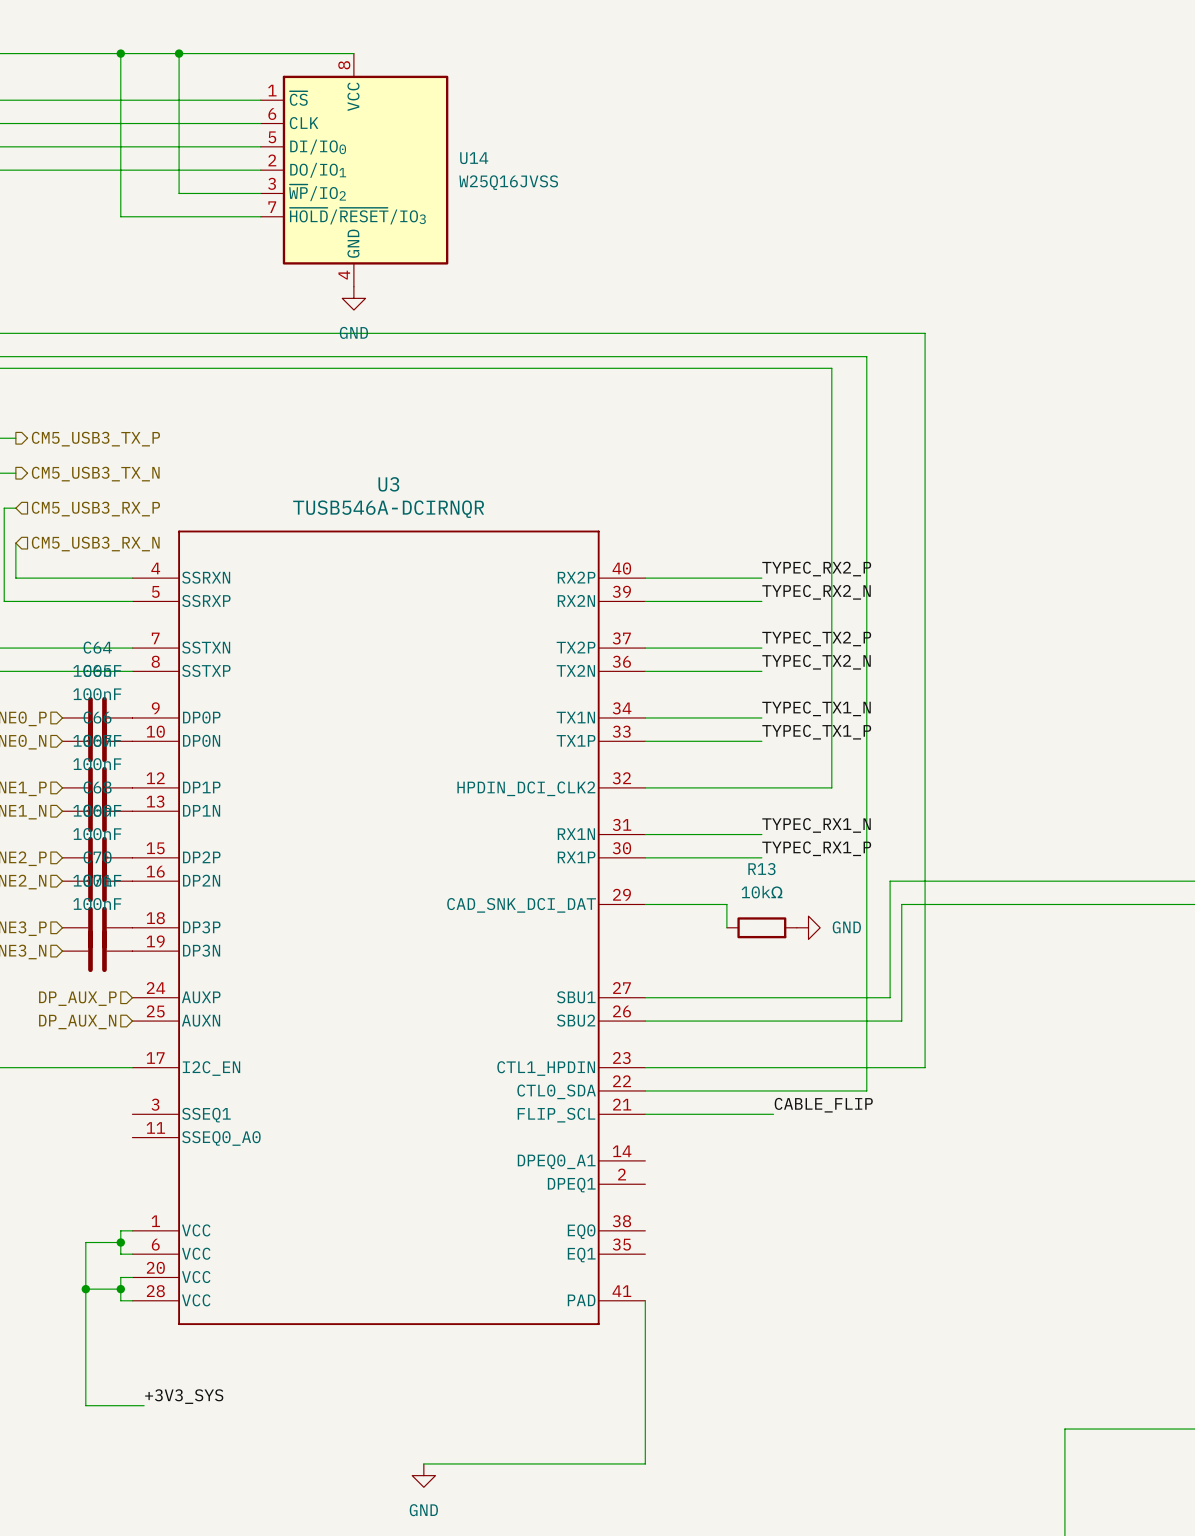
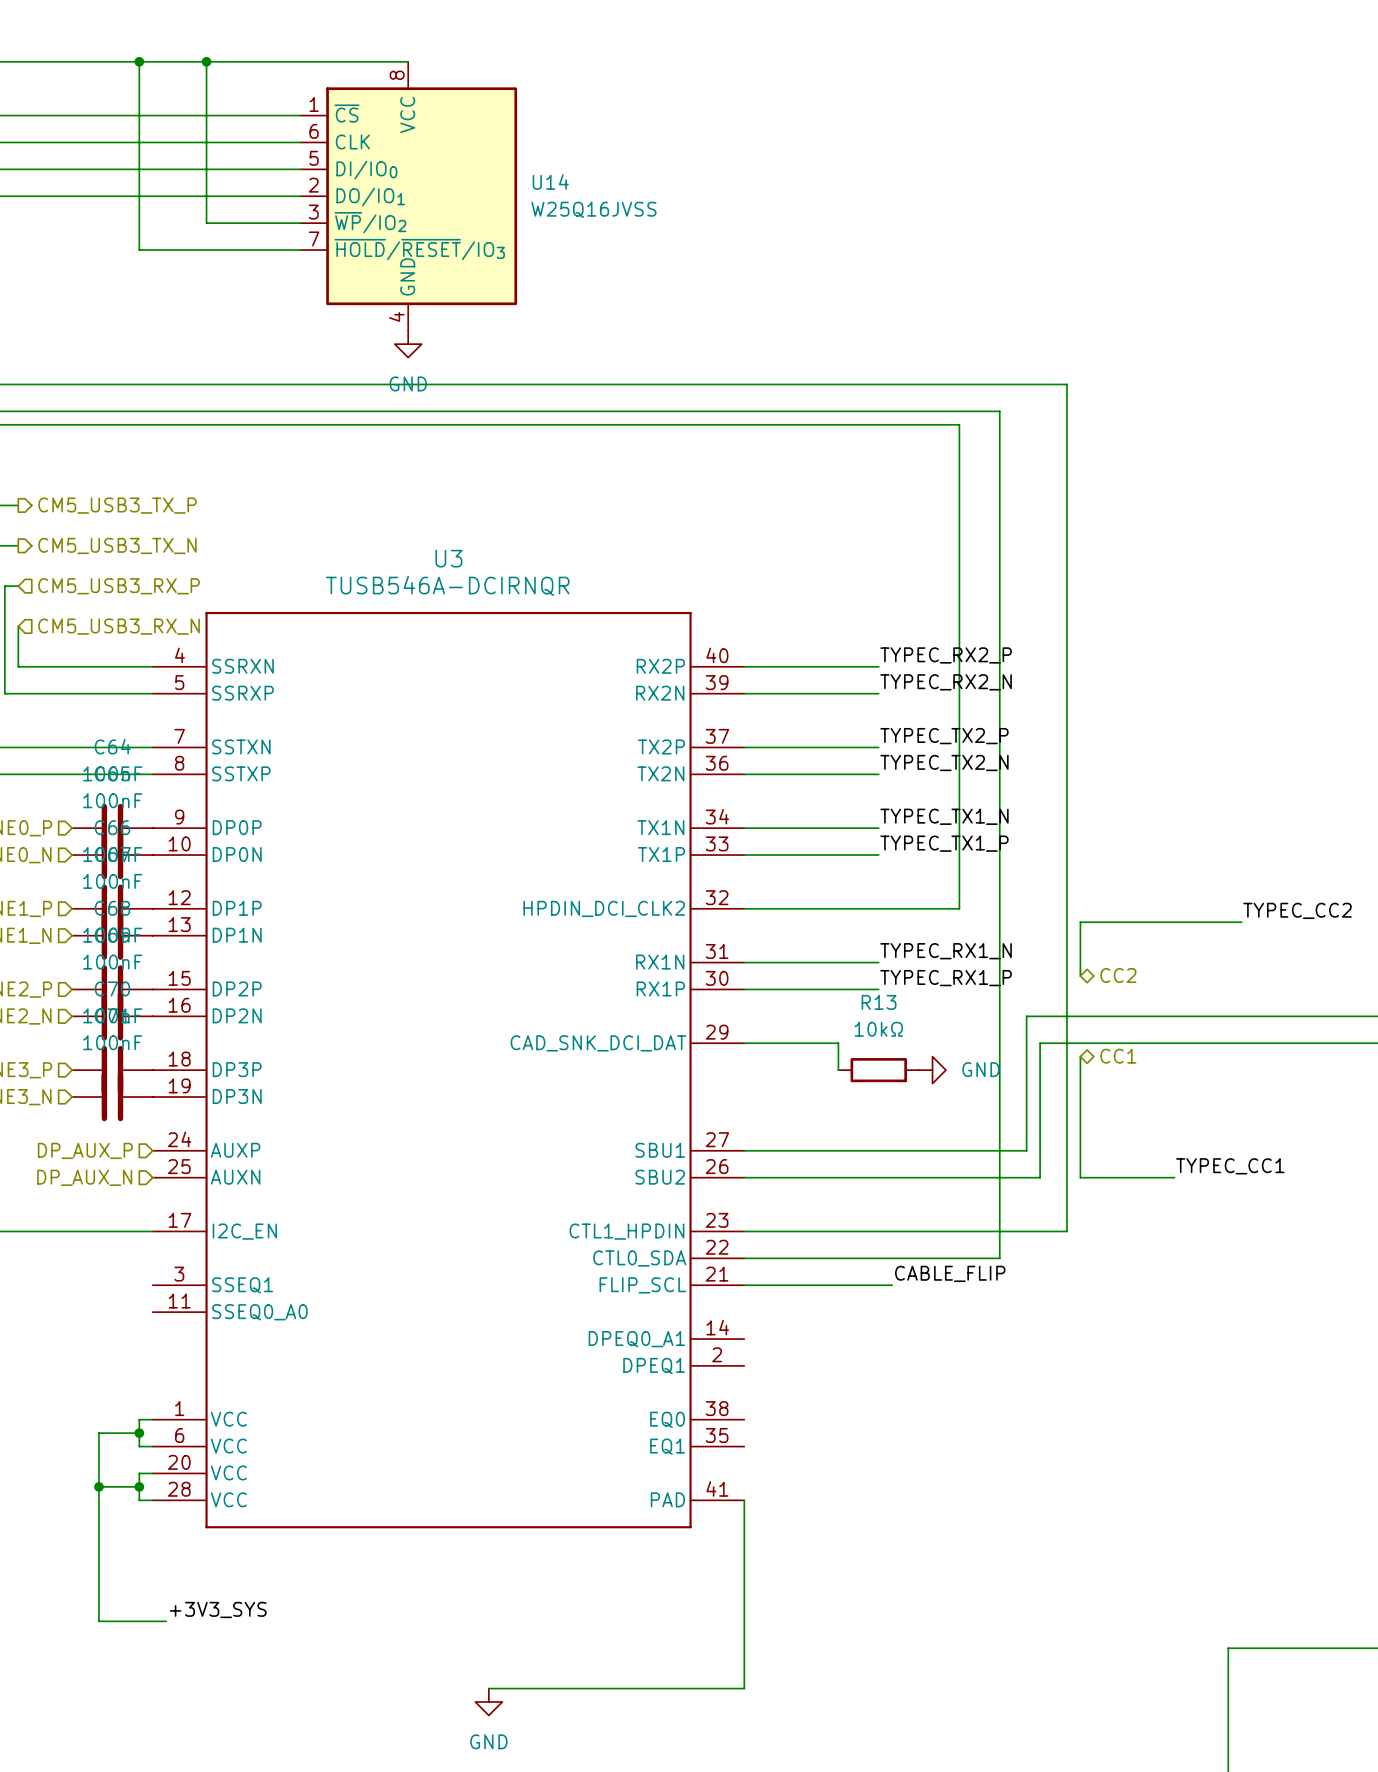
label: none -> TYPEC_CC2 (1297, 910)
wire: none -> (1241, 922) (1080, 922) (1080, 976)
hierarchical label: none -> CC2 (1118, 975)
hierarchical label: none -> CC1 (1118, 1056)
wire: none -> (1080, 1056) (1080, 1177) (1174, 1177)
label: none -> TYPEC_CC1 (1230, 1166)

